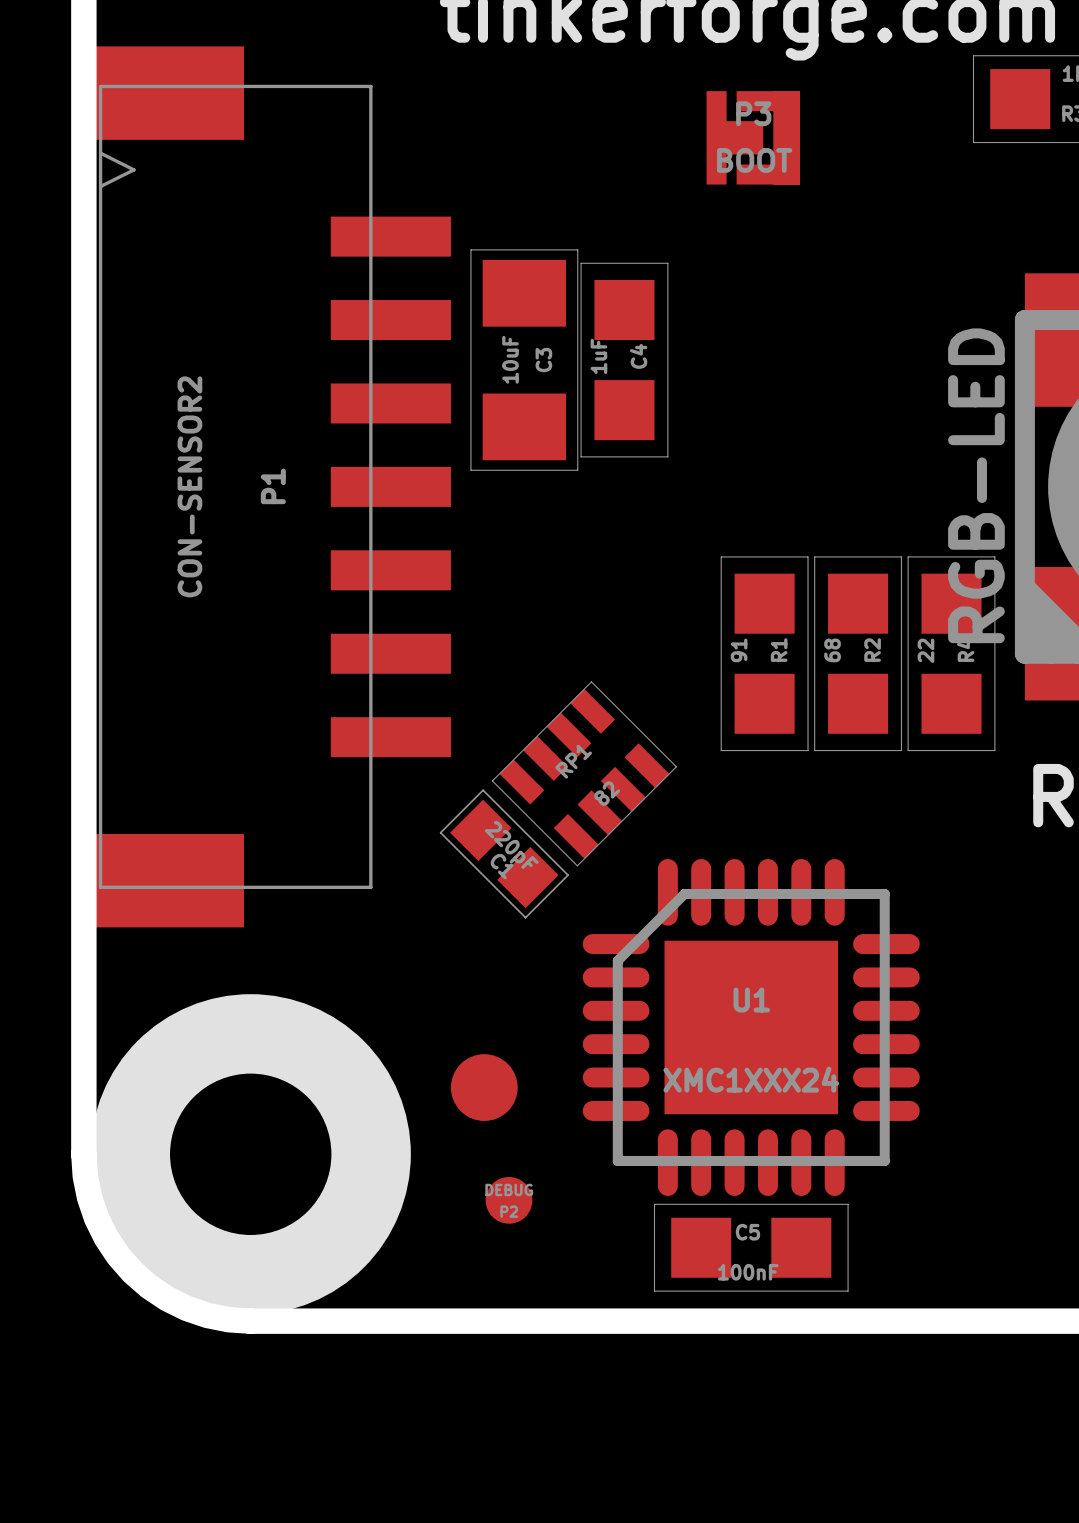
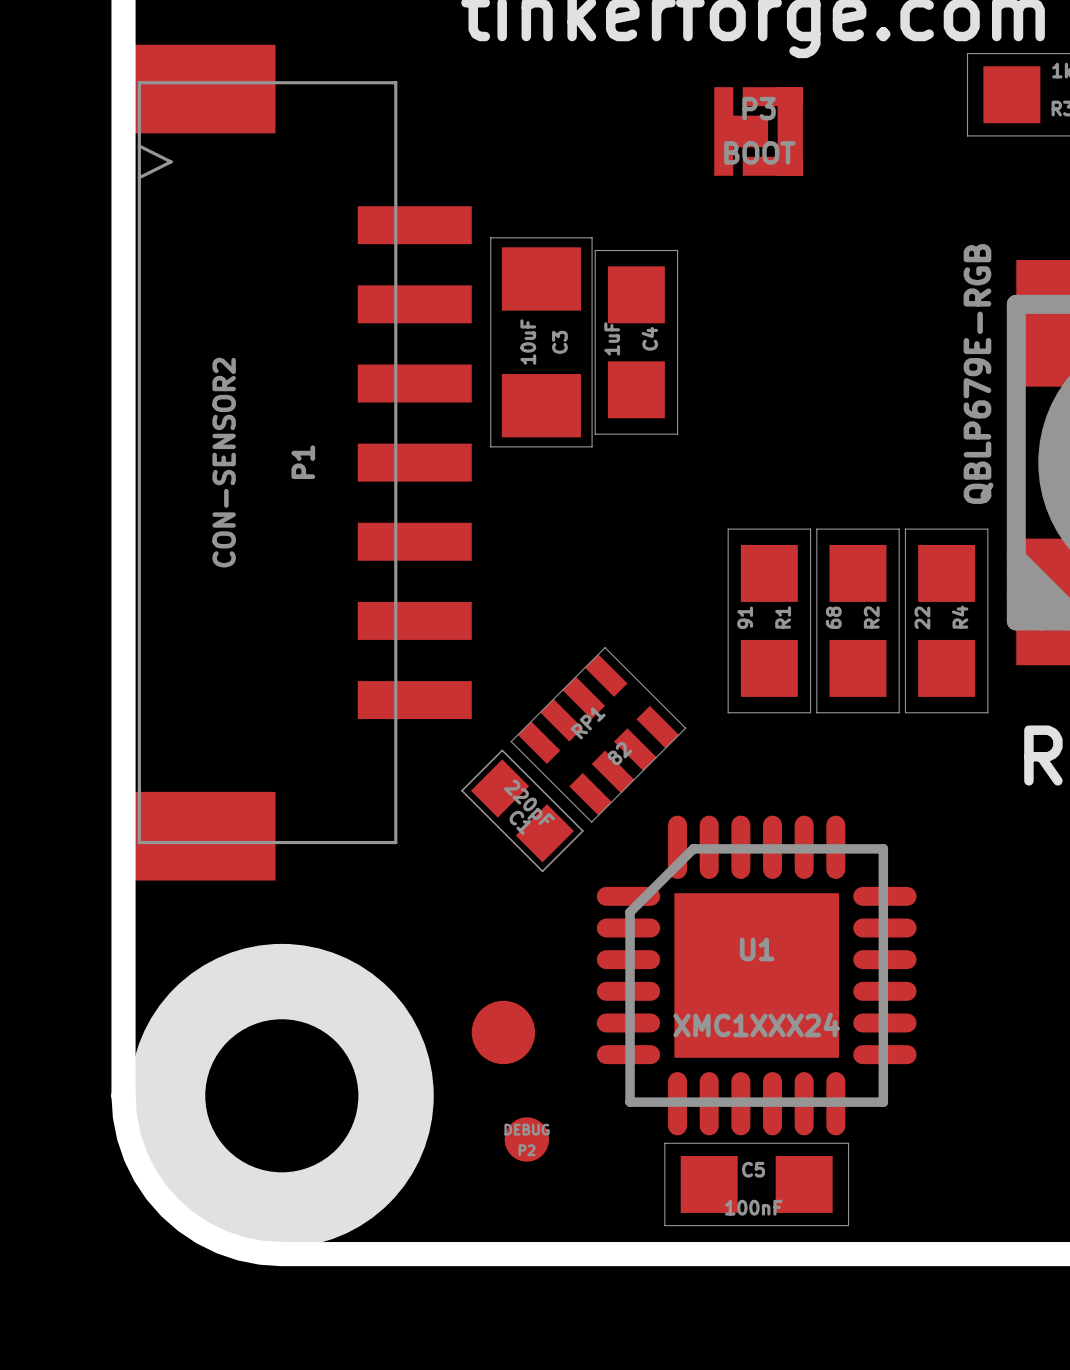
part value: RGB-LED (976, 485) -> QBLP679E-RGB (978, 373)

